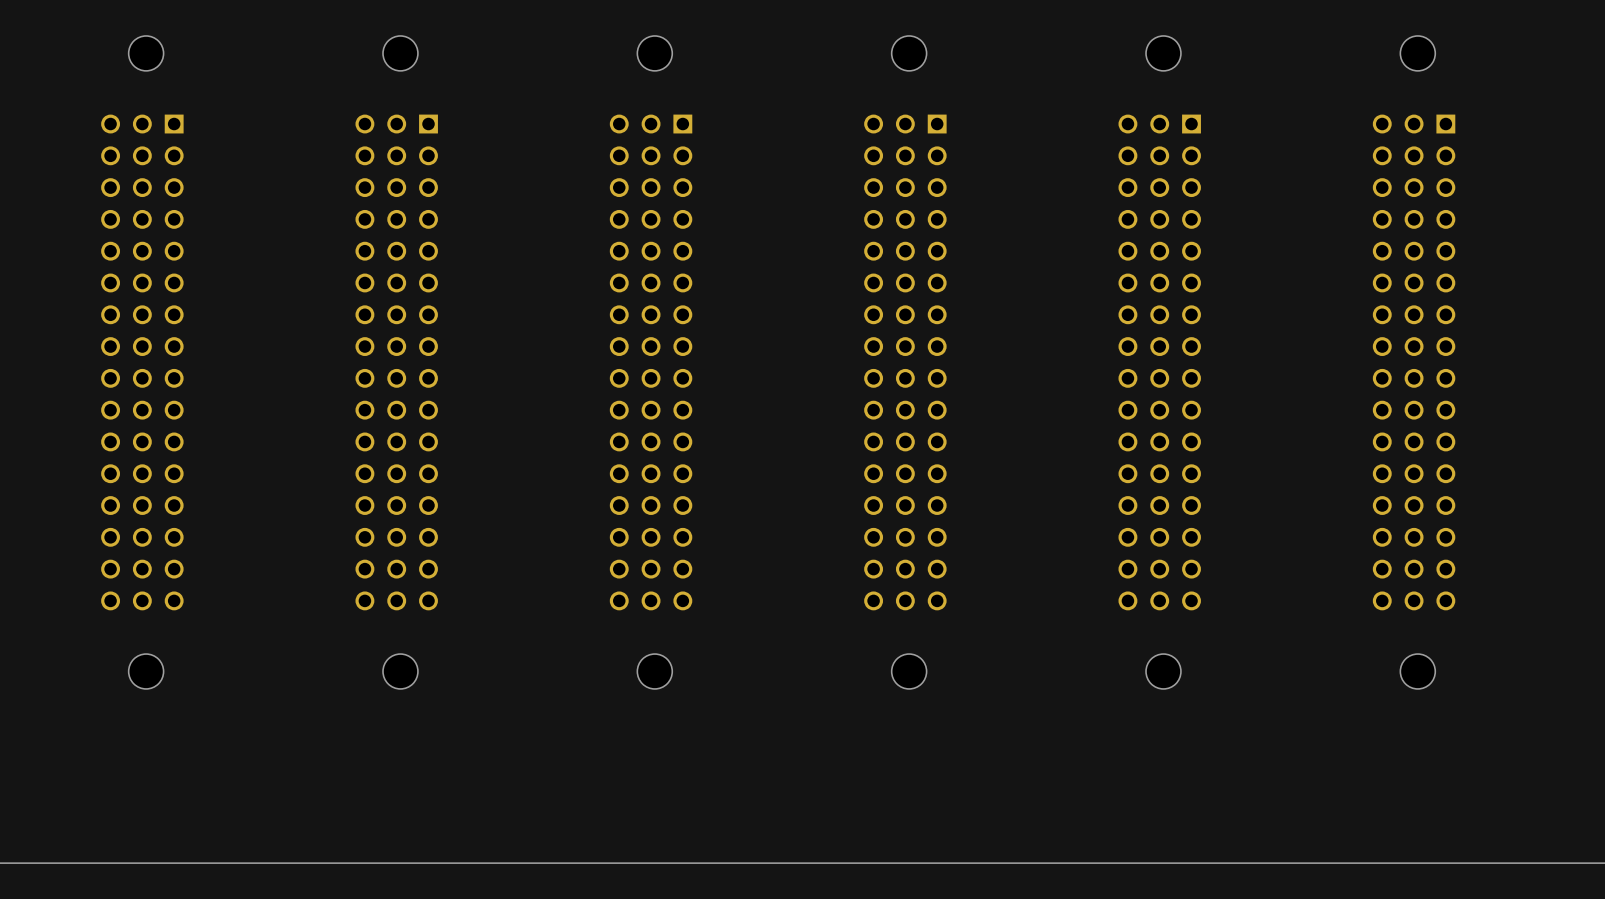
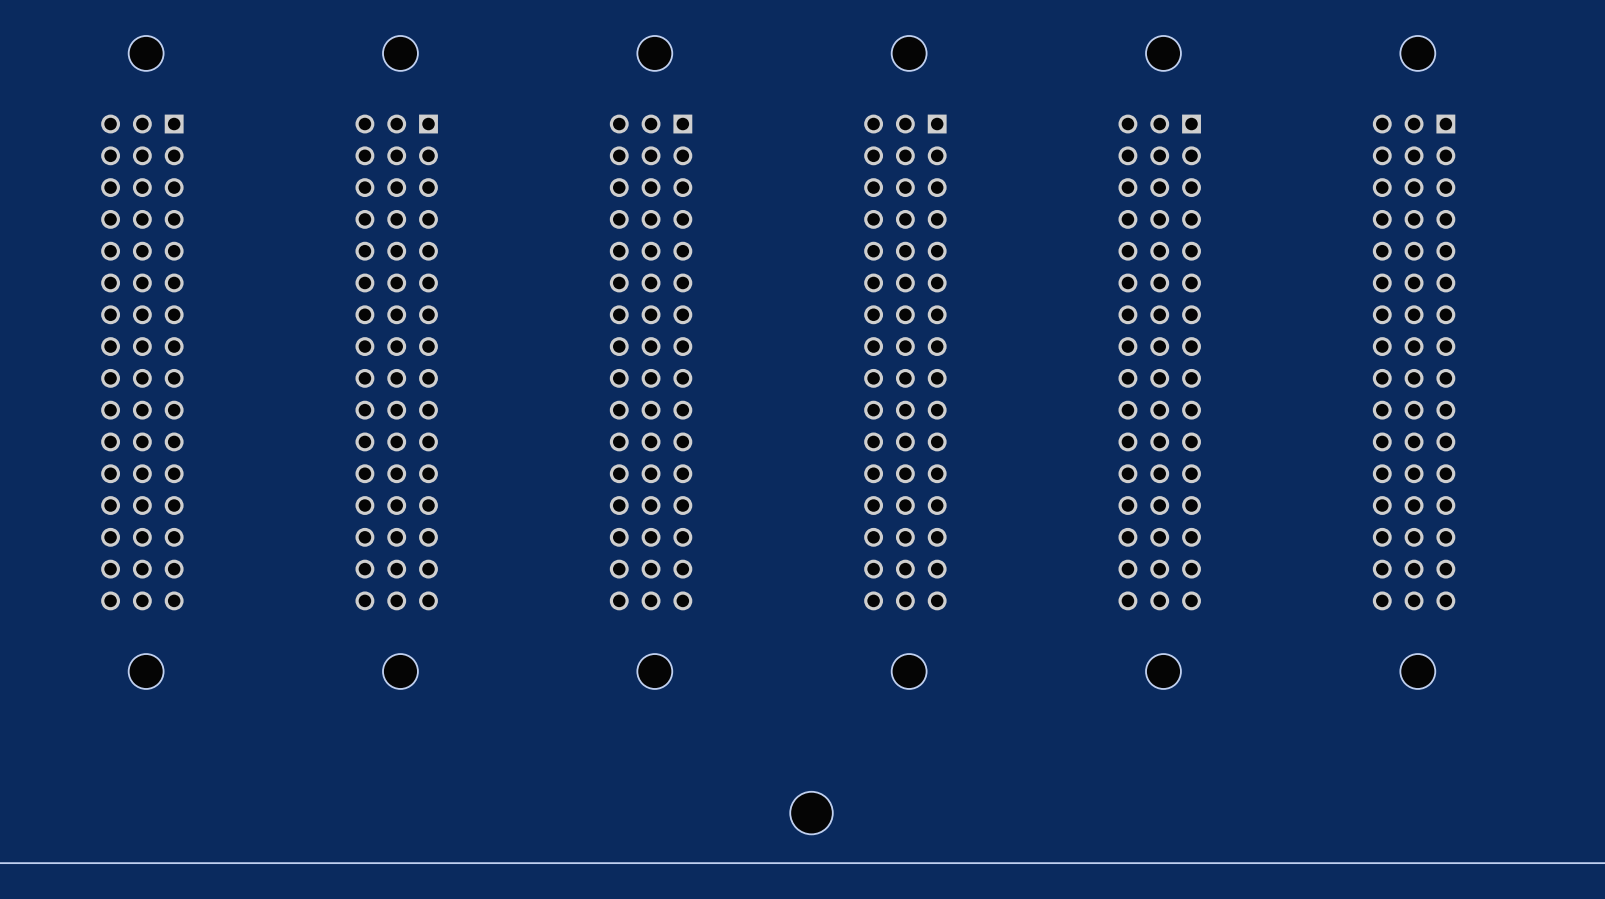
hole: none -> (811, 813)

